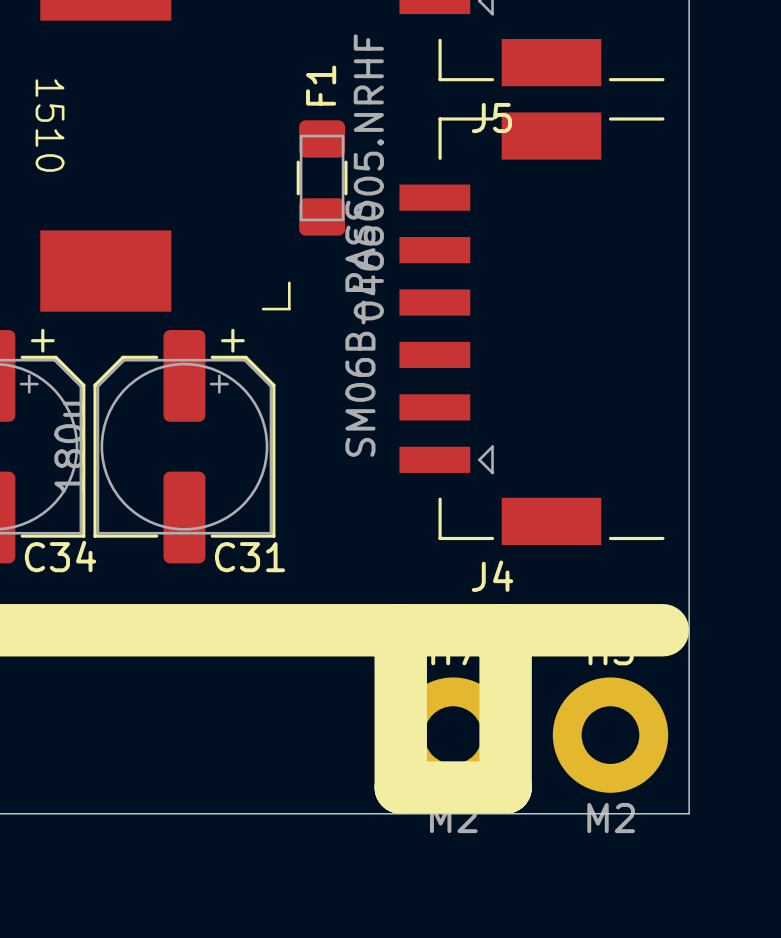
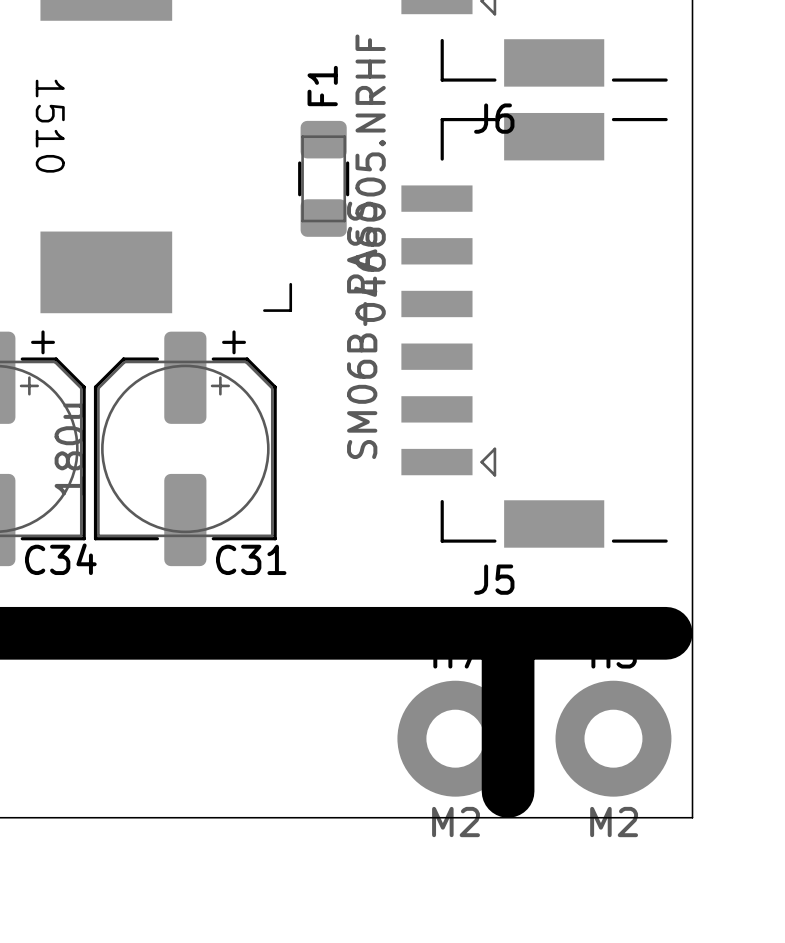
J5 name: J5 (491, 118) -> J6 (494, 118)
J4 name: J4 (492, 576) -> J5 (494, 579)
line: (400, 630) (400, 787) (505, 787) -> none

